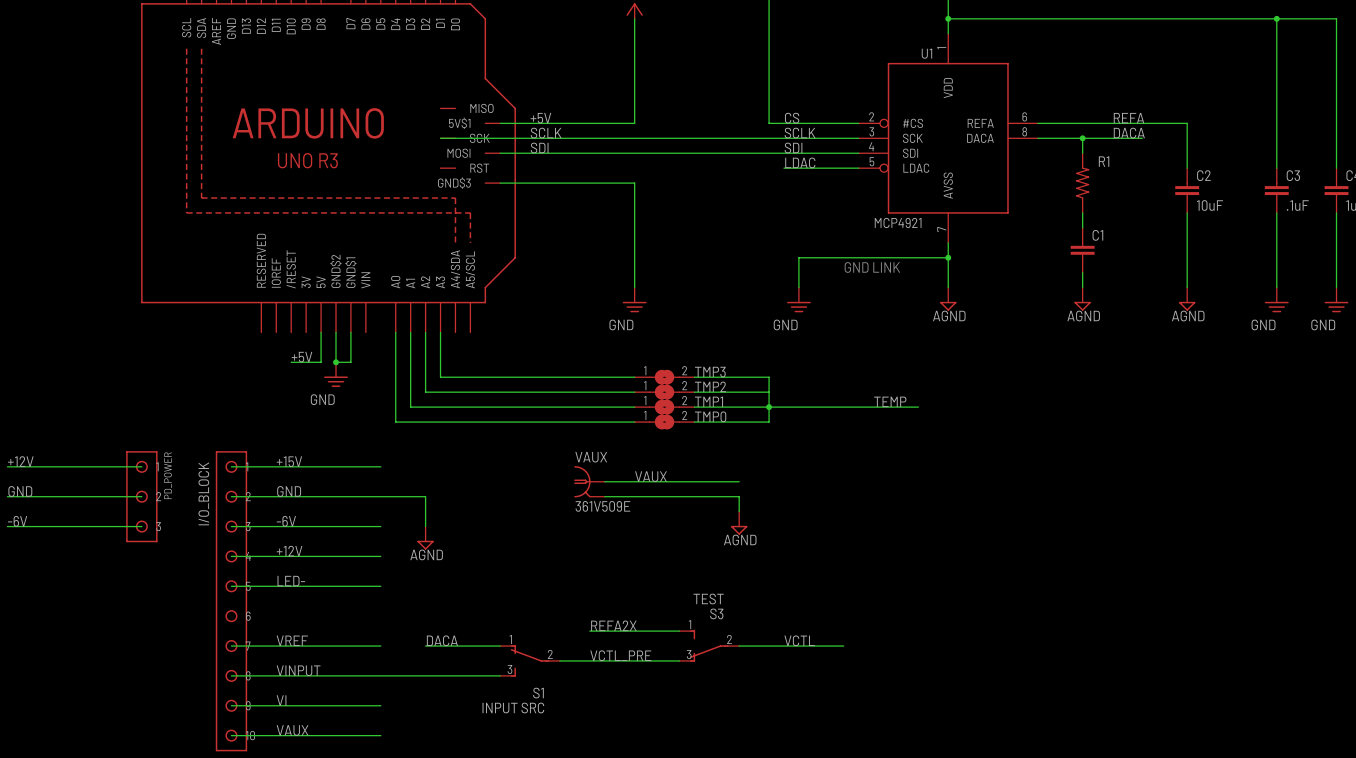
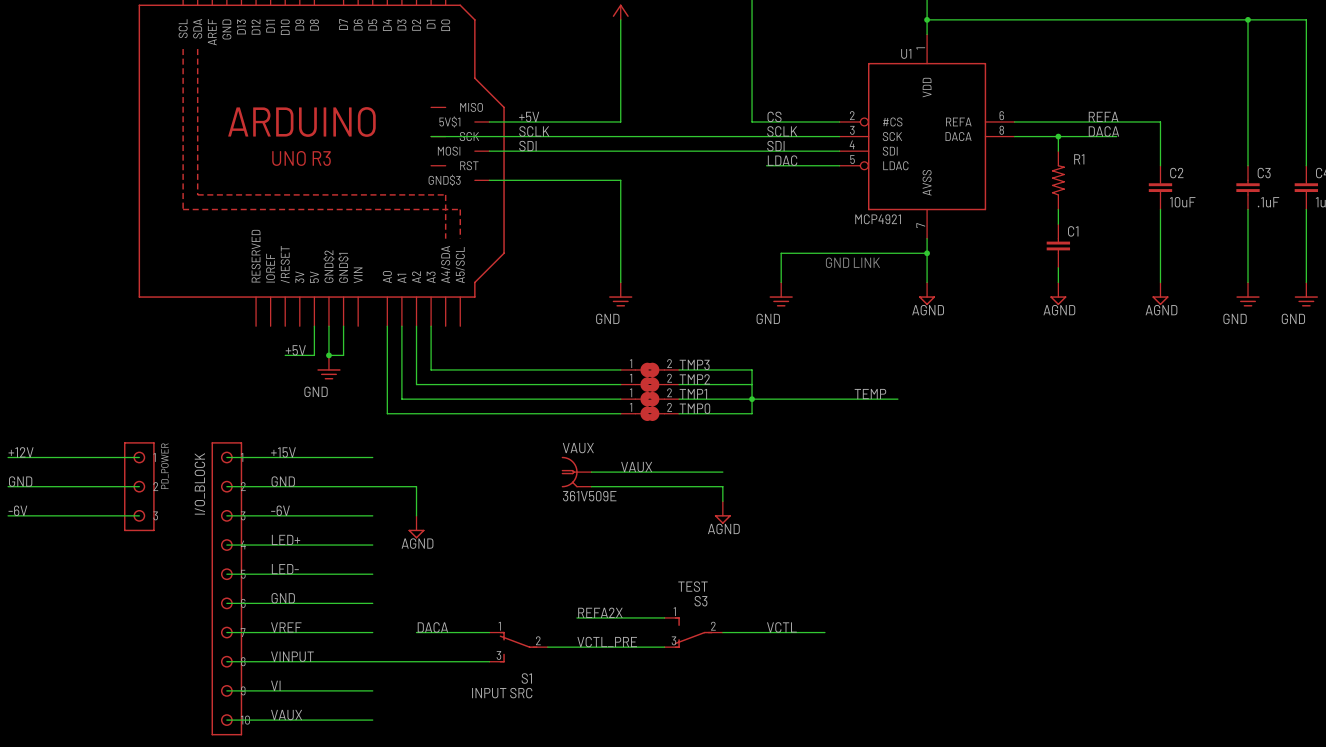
label: +12V (289, 551) -> LED+ (286, 539)
label: none -> GND (283, 598)
wire: none -> (226, 603) (372, 603)

